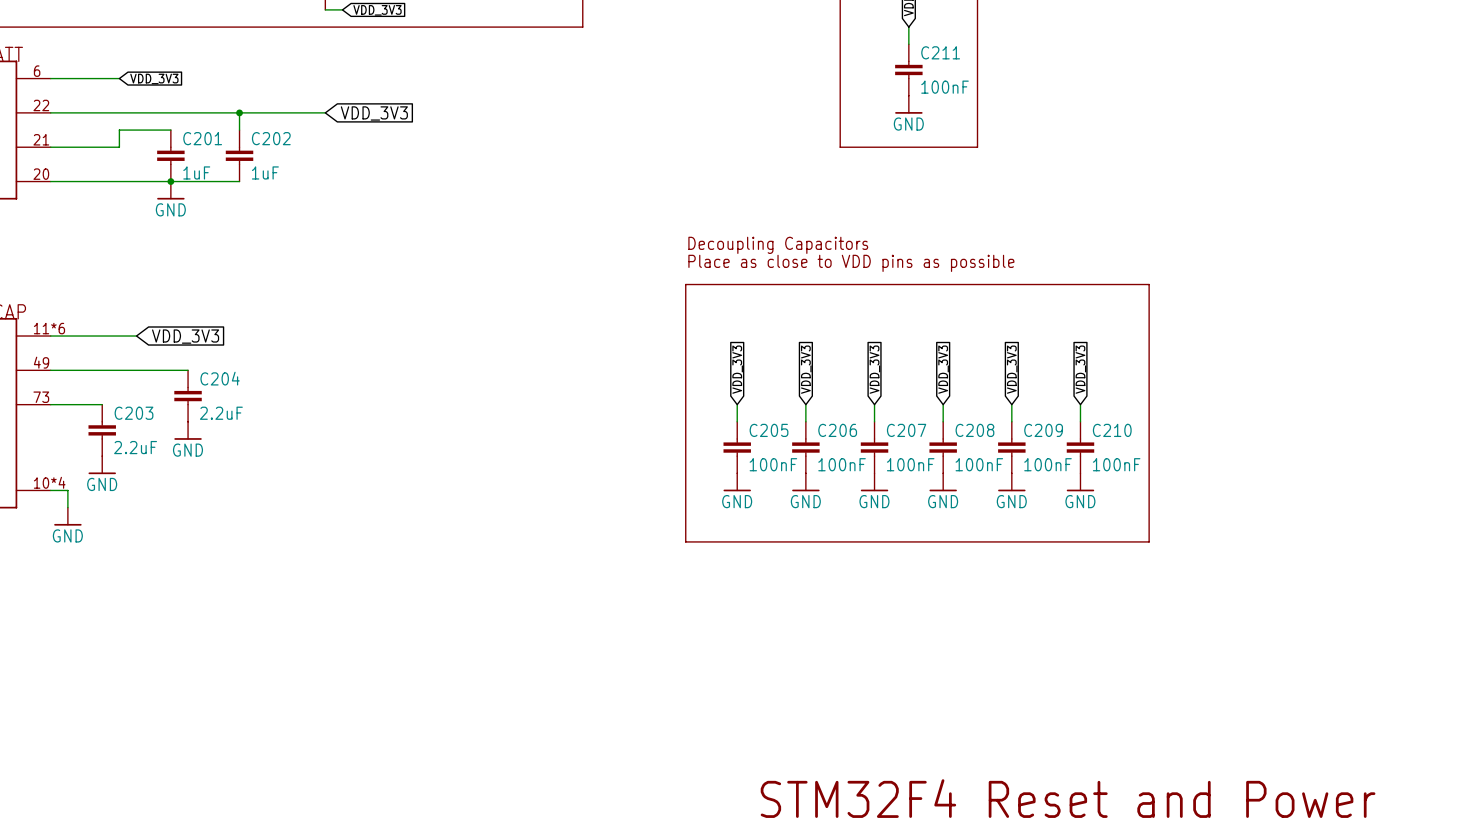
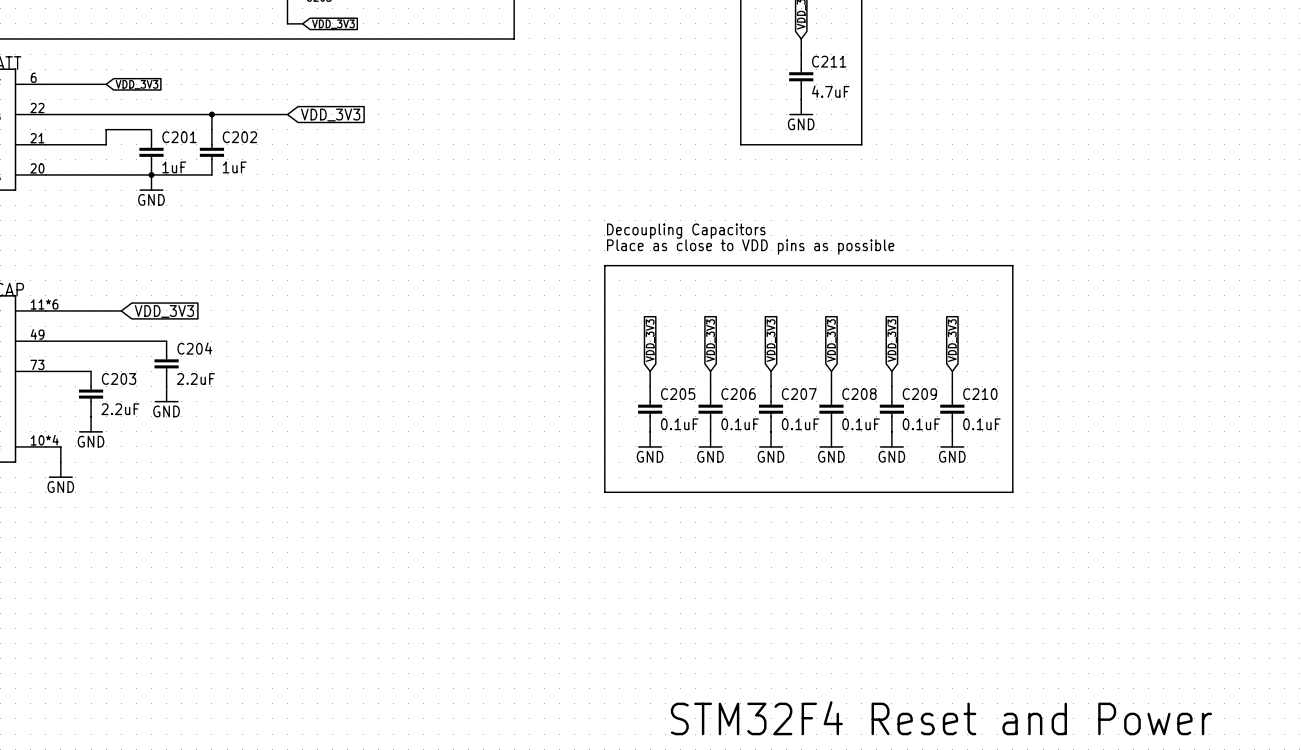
C211 value: 100nF (945, 87) -> 4.7uF (830, 91)
C205 value: 100nF (773, 464) -> 0.1uF (679, 424)
C206 value: 100nF (842, 464) -> 0.1uF (740, 424)
C207 value: 100nF (910, 464) -> 0.1uF (800, 424)
C208 value: 100nF (979, 464) -> 0.1uF (861, 424)
C209 value: 100nF (1047, 464) -> 0.1uF (921, 424)
C210 value: 100nF (1116, 464) -> 0.1uF (981, 424)

